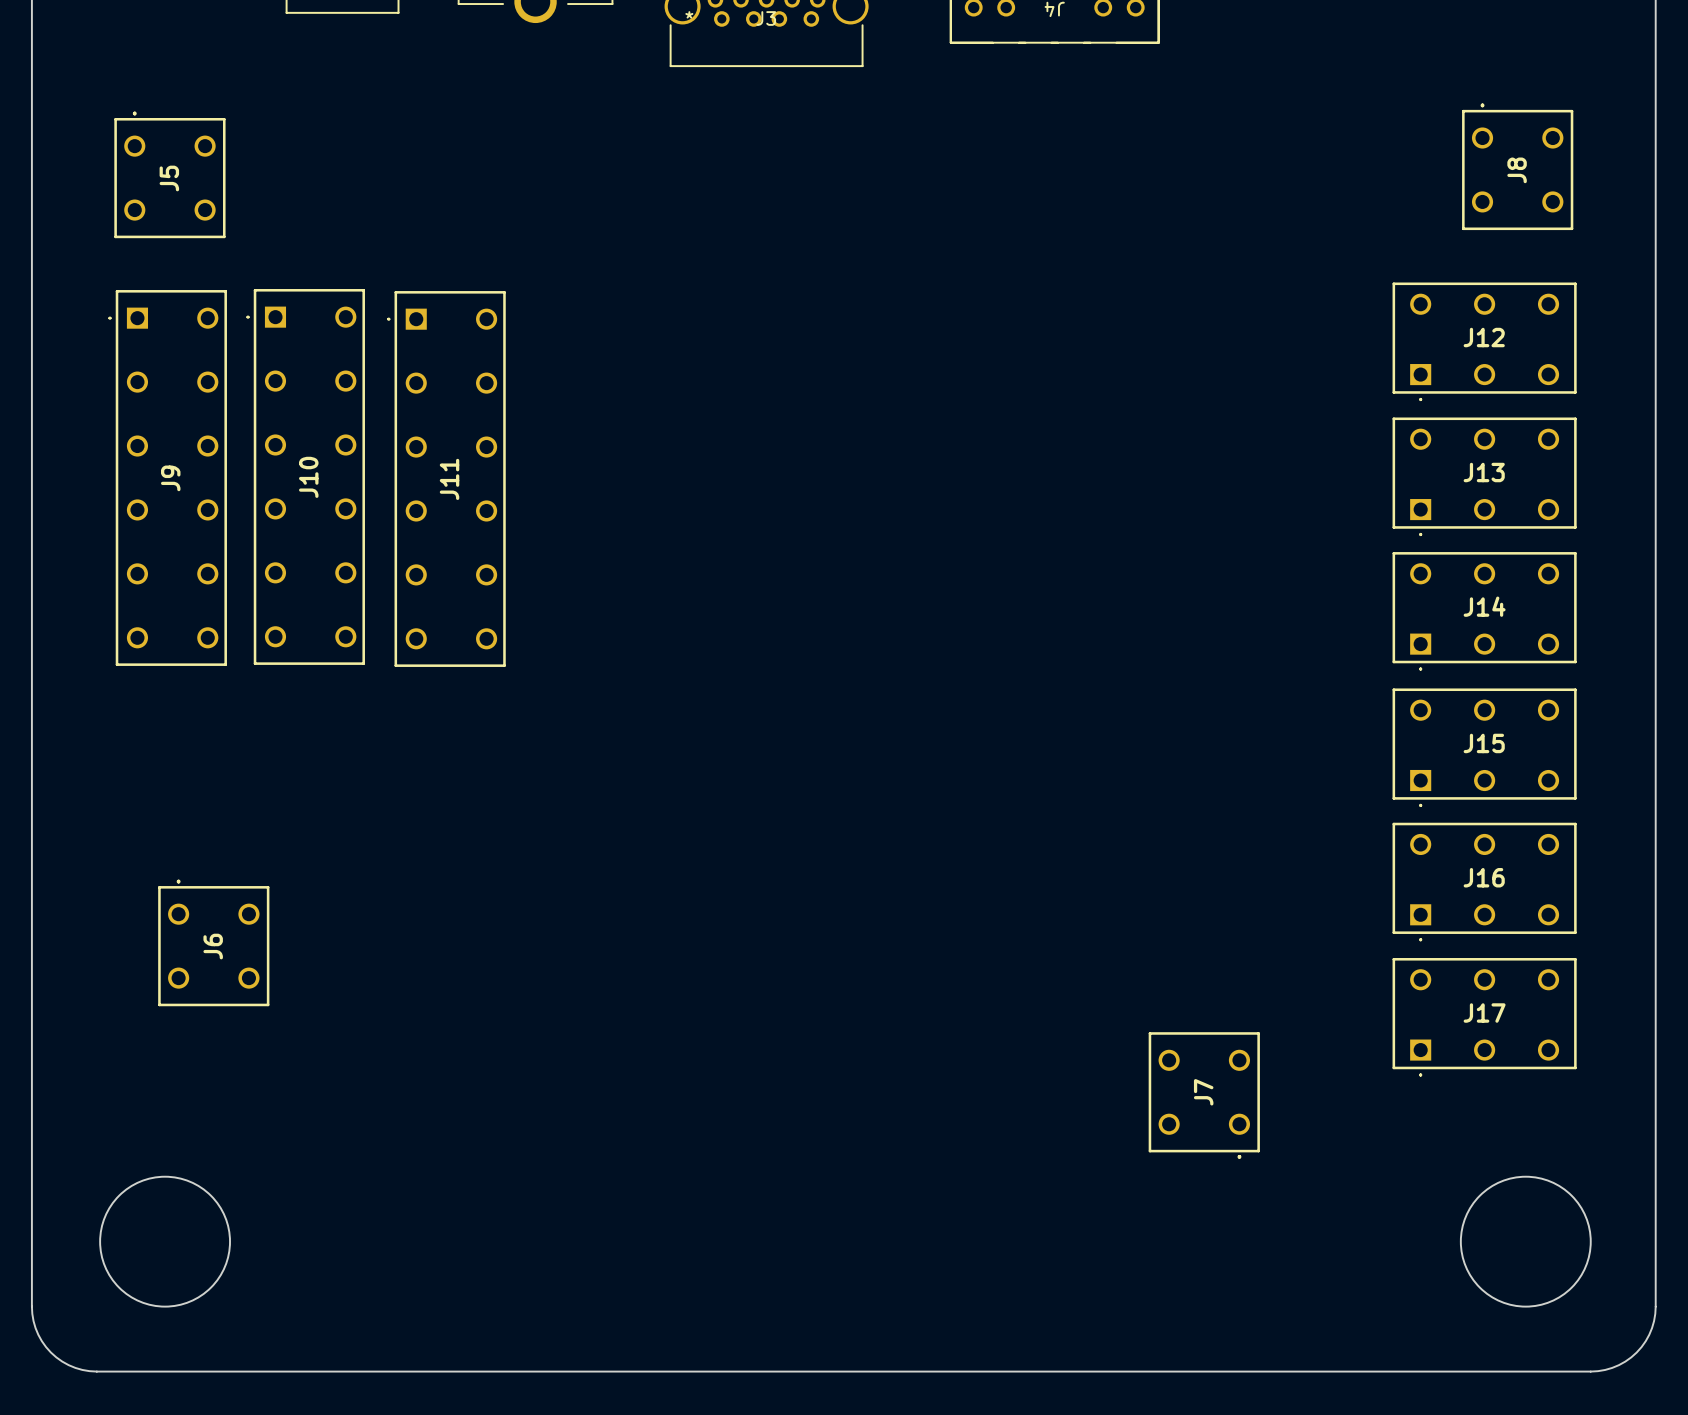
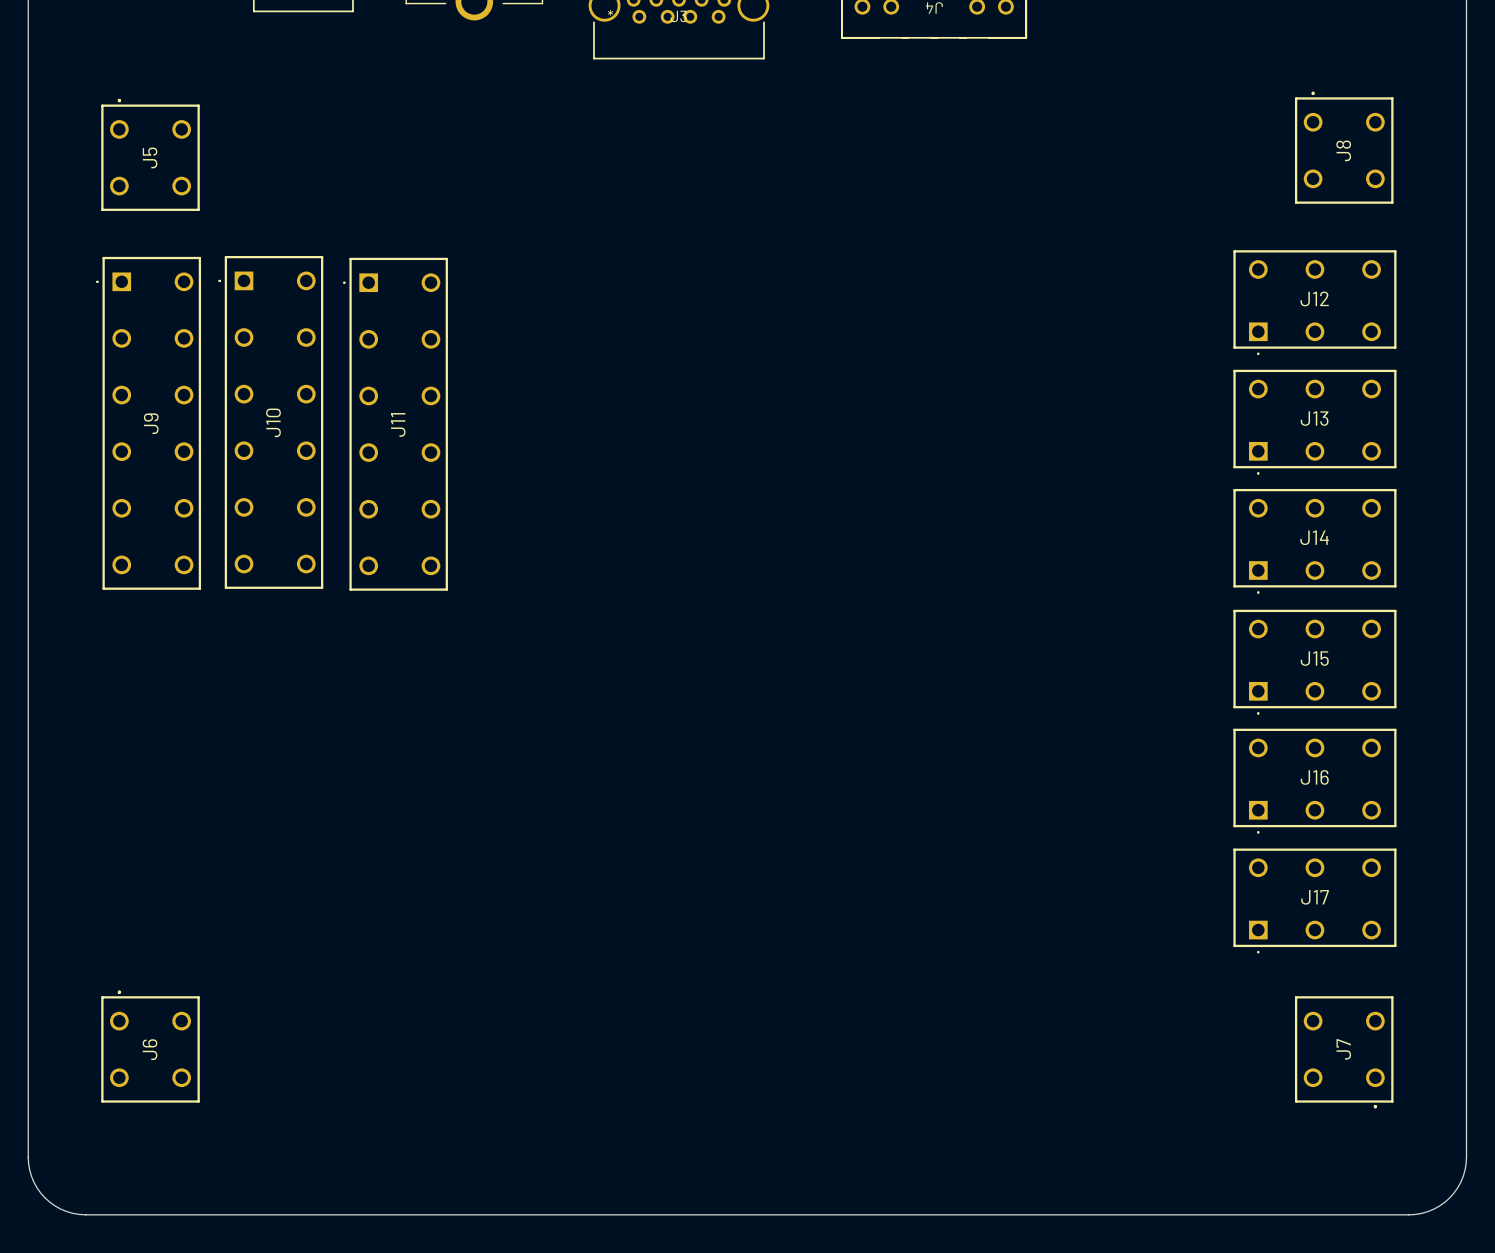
J6 position: (213, 942) -> (150, 1046)
J7 position: (1204, 1095) -> (1344, 1052)
round board edge: [99, 1176, 231, 1308] -> none
round board edge: [1460, 1176, 1592, 1308] -> none

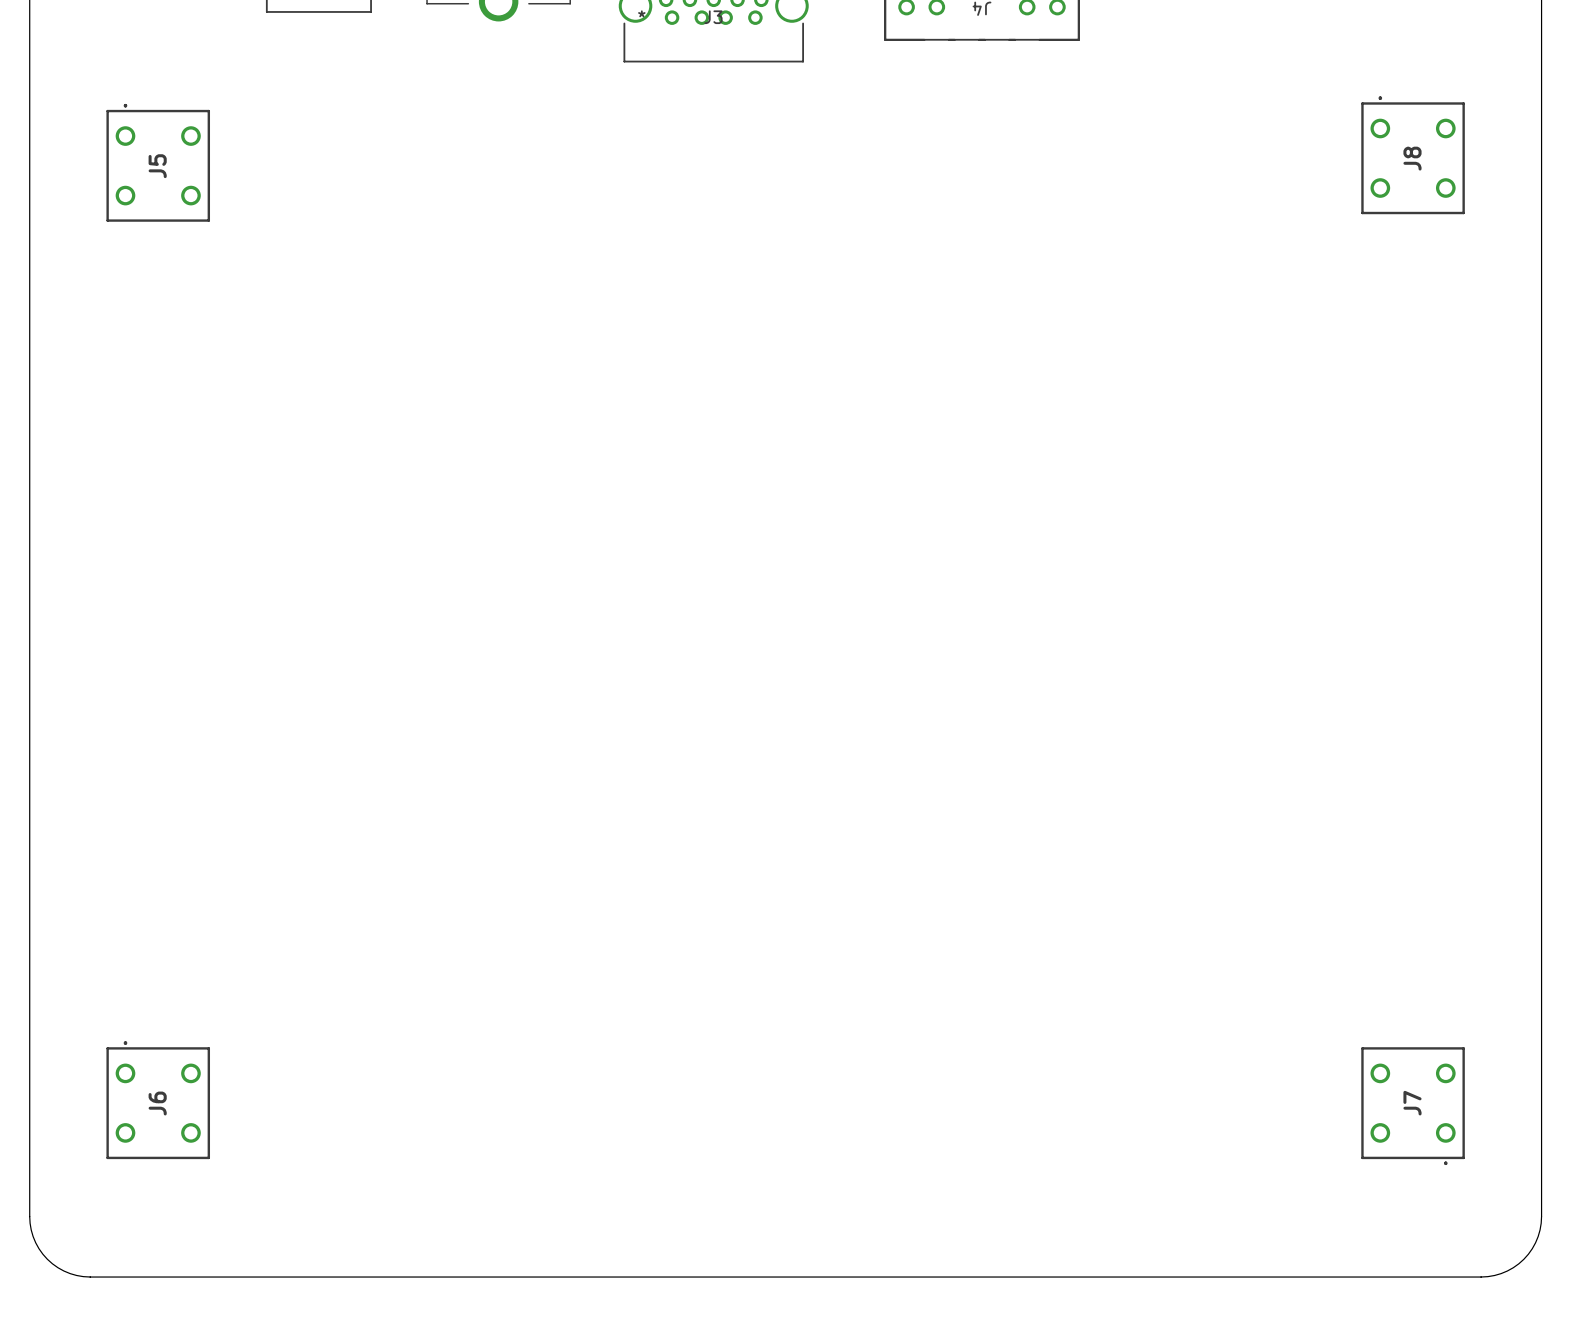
J12: (1314, 302) -> none
J10: (270, 422) -> none
J13: (1314, 422) -> none
J9: (148, 423) -> none
J11: (395, 424) -> none
J14: (1314, 541) -> none
J15: (1314, 662) -> none
J16: (1314, 781) -> none
J17: (1314, 900) -> none

